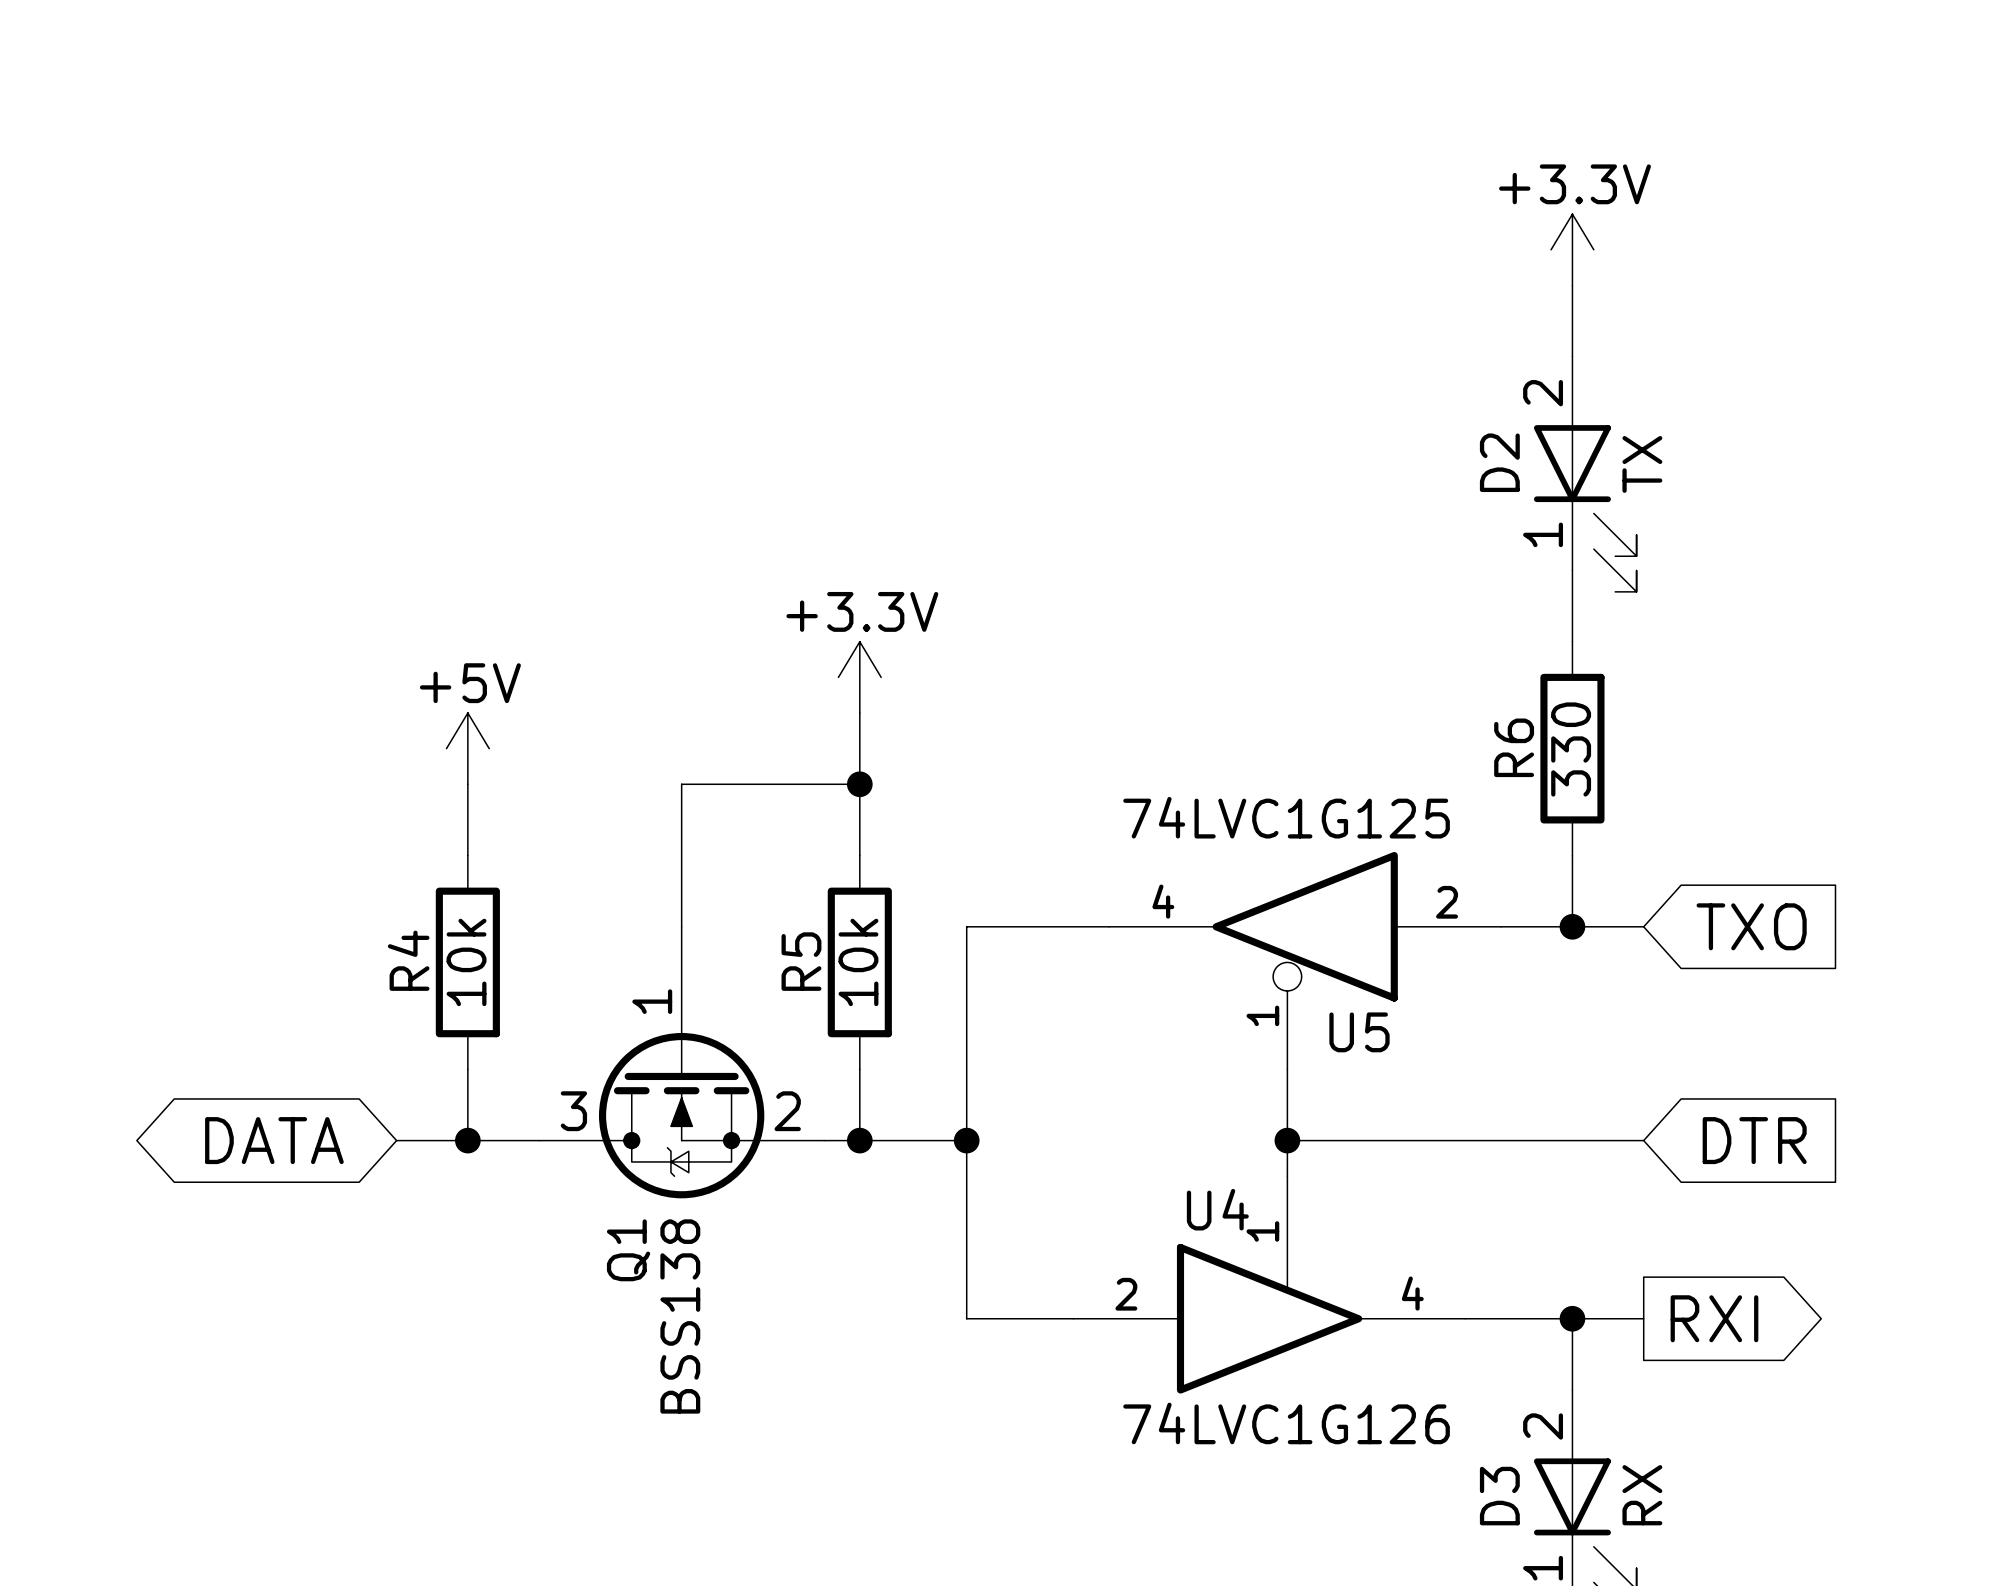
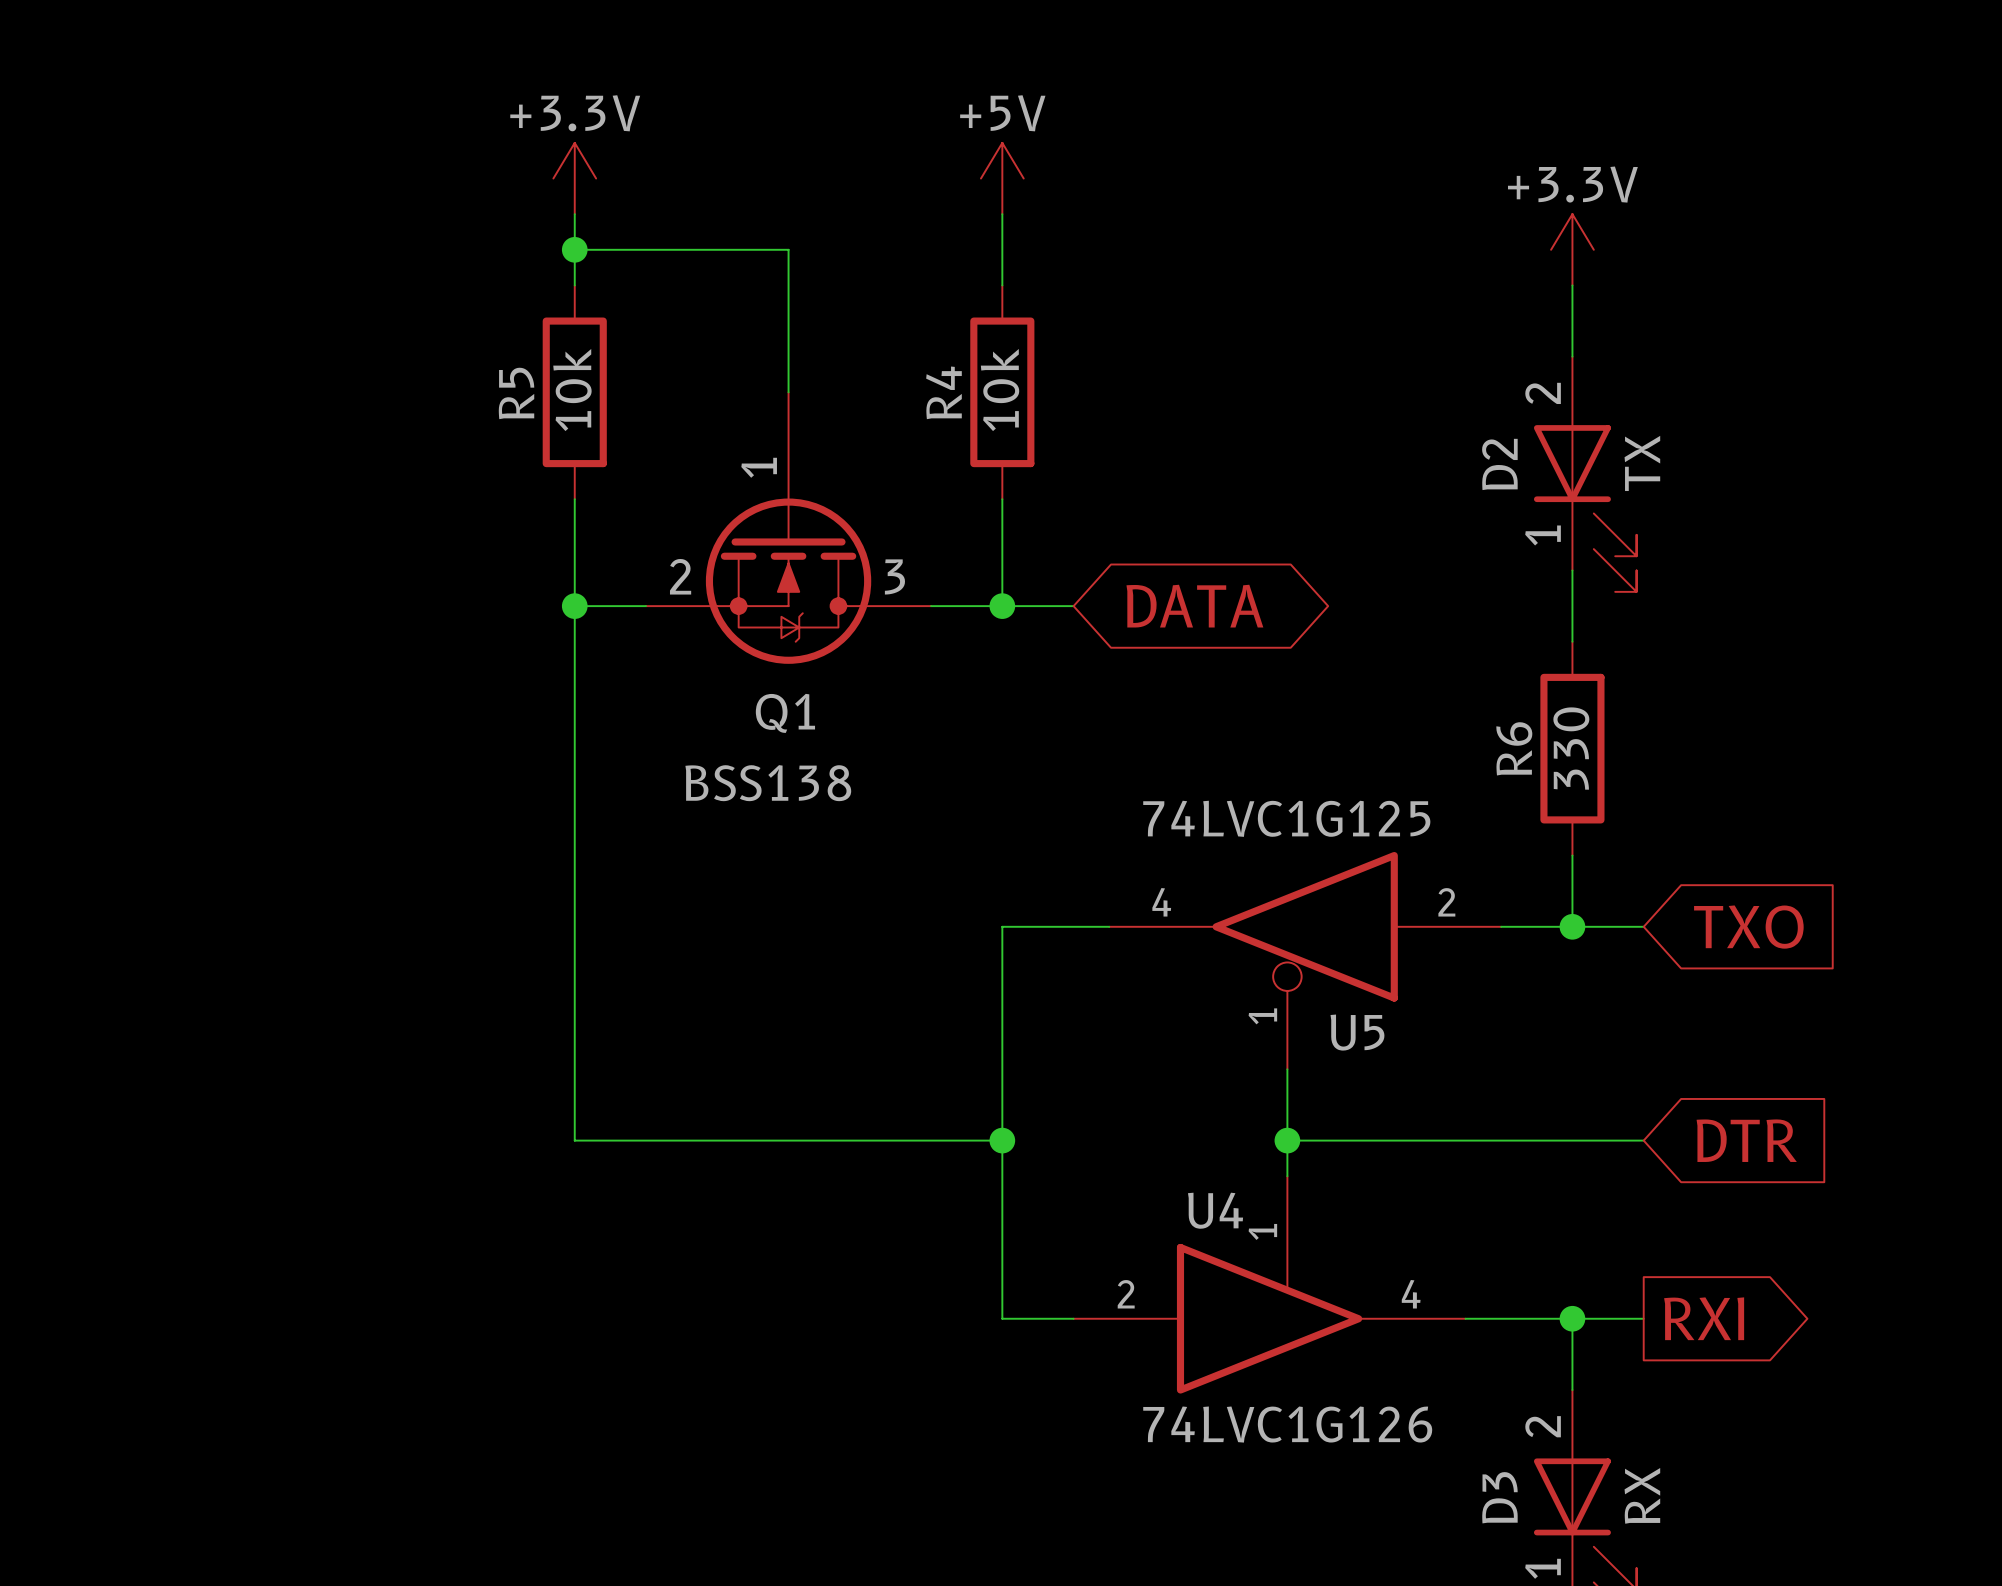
power symbol: none -> +5V (1002, 178)
wire: none -> (1002, 214) (1002, 285)
wire: none -> (574, 249) (788, 249) (788, 392)
junction: none -> (574, 249)
wire: none -> (574, 499) (574, 1140) (824, 1140)
wire: none -> (1002, 499) (1002, 606)
wire: none -> (574, 606) (646, 606)
junction: none -> (574, 606)
wire: none -> (931, 606) (1073, 606)
junction: none -> (1002, 606)
global label: none -> DATA (1194, 606)
power symbol position: +3.3V (859, 677) -> +3.3V (574, 178)
wire: (859, 713) (859, 855) -> none
power symbol: +5V (467, 748) -> none
wire: (467, 784) (467, 855) -> (574, 214) (574, 285)
wire: (859, 784) (681, 784) (681, 926) -> none
junction: (859, 784) -> none
wire: (1002, 926) (966, 926) (966, 1318) (1002, 1318) -> (1002, 926) (1002, 1318)
R4 position: (467, 962) -> (1002, 392)
R5 position: (859, 962) -> (574, 392)
Q1 position: (681, 1062) -> (788, 528)
wire: (467, 1069) (467, 1140) -> none
wire: (859, 1069) (859, 1140) -> none
Q1 flip: as is (681, 1115) -> left-right (788, 581)
global label: DATA (274, 1140) -> none
wire: (396, 1140) (539, 1140) -> none
junction: (467, 1140) -> none
junction: (859, 1140) -> none
wire: none -> (966, 1140) (1002, 1140)
junction position: (966, 1140) -> (1002, 1140)

